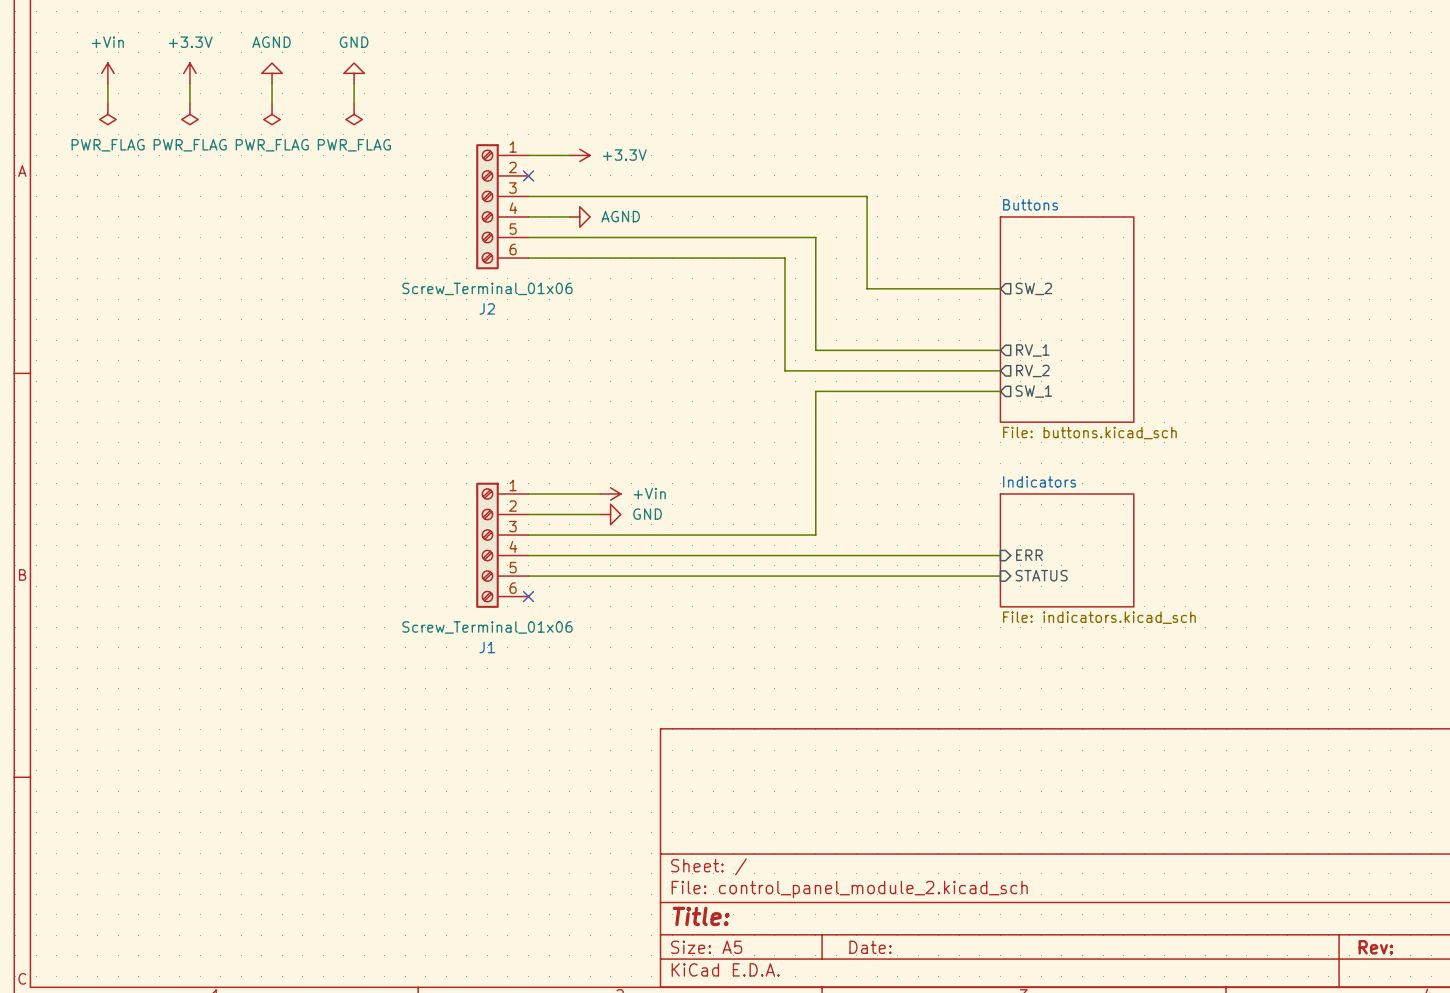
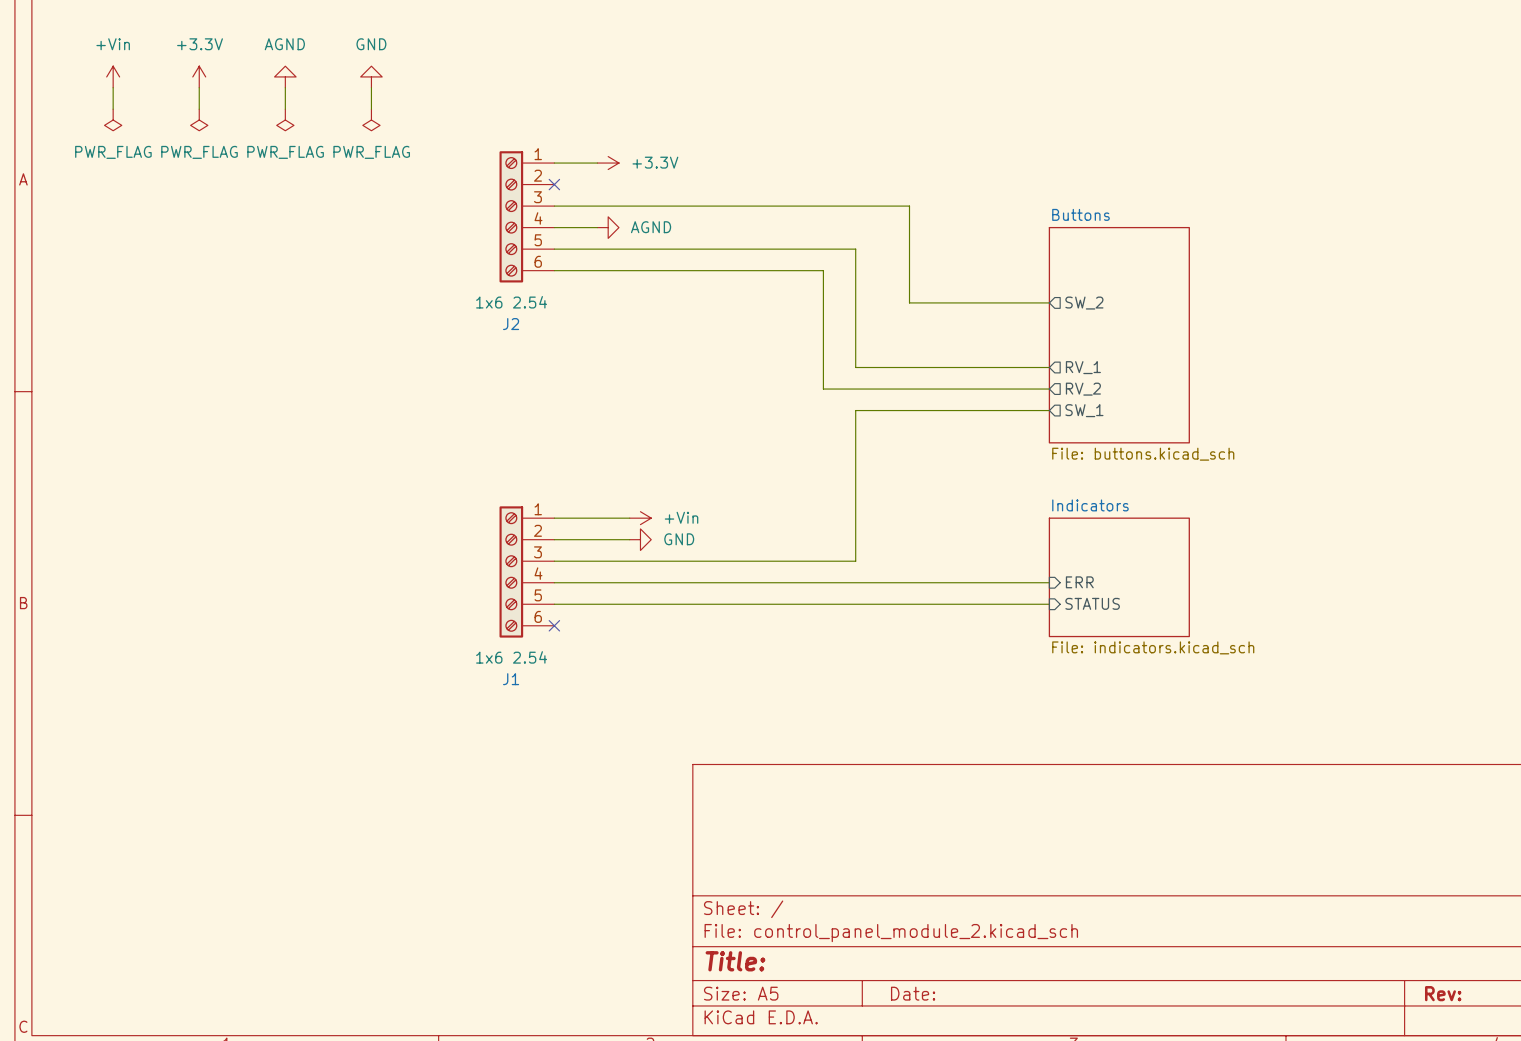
J2 value: Screw_Terminal_01x06 (487, 288) -> 1x6 2.54 (511, 302)
J1 value: Screw_Terminal_01x06 (487, 627) -> 1x6 2.54 (511, 657)

